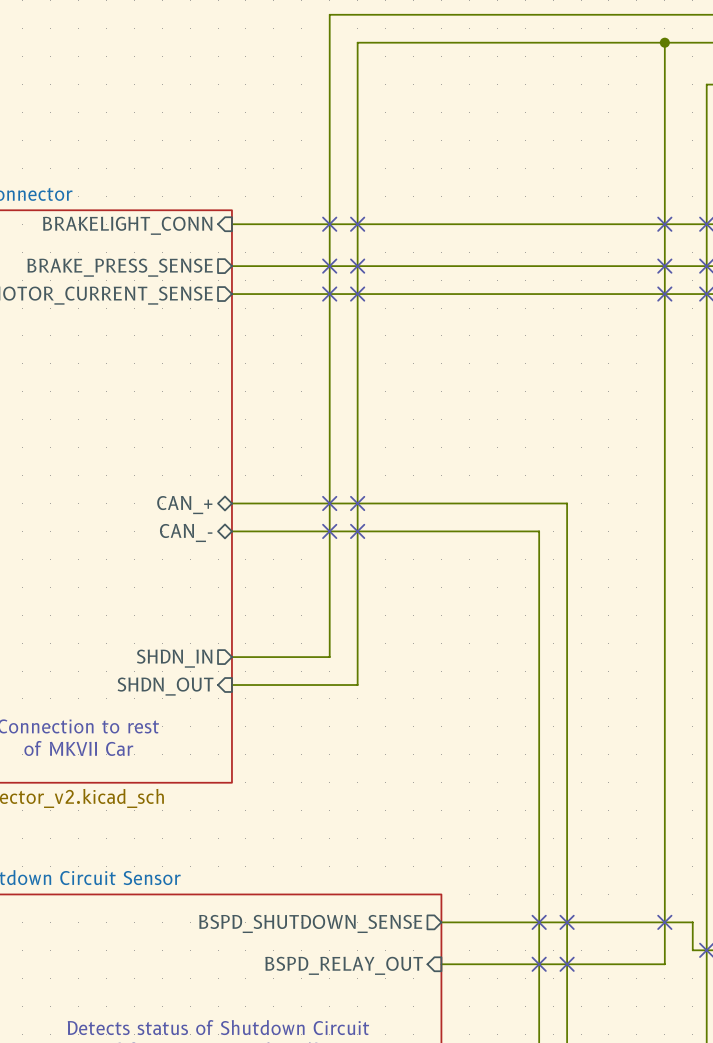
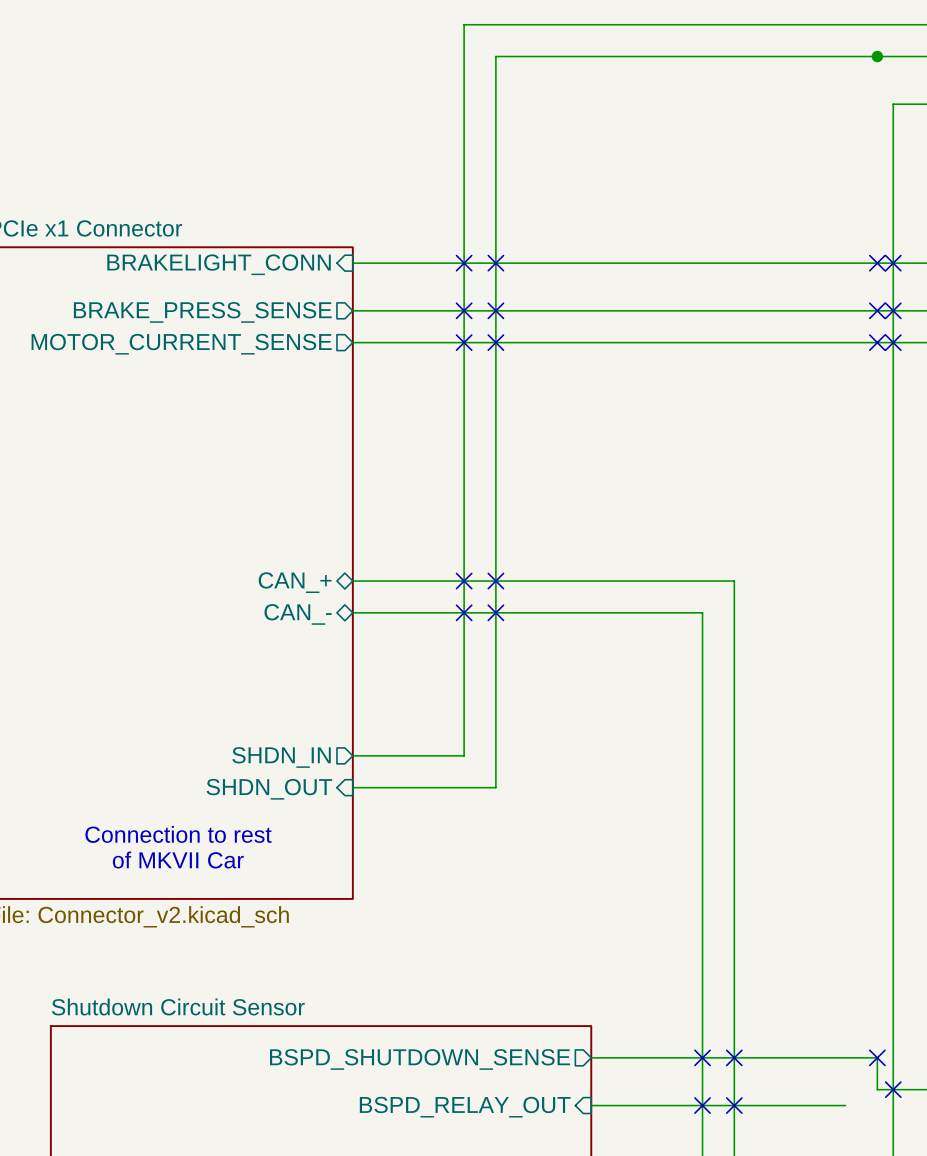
wire: (664, 42) (664, 964) -> none
junction position: (664, 42) -> (877, 56)
no-connect mark: (664, 224) -> none
no-connect mark: none -> (877, 263)
no-connect mark: (664, 266) -> none
no-connect mark: none -> (877, 310)
no-connect mark: (664, 294) -> none
no-connect mark: none -> (877, 342)
no-connect mark position: (664, 922) -> (877, 1057)

